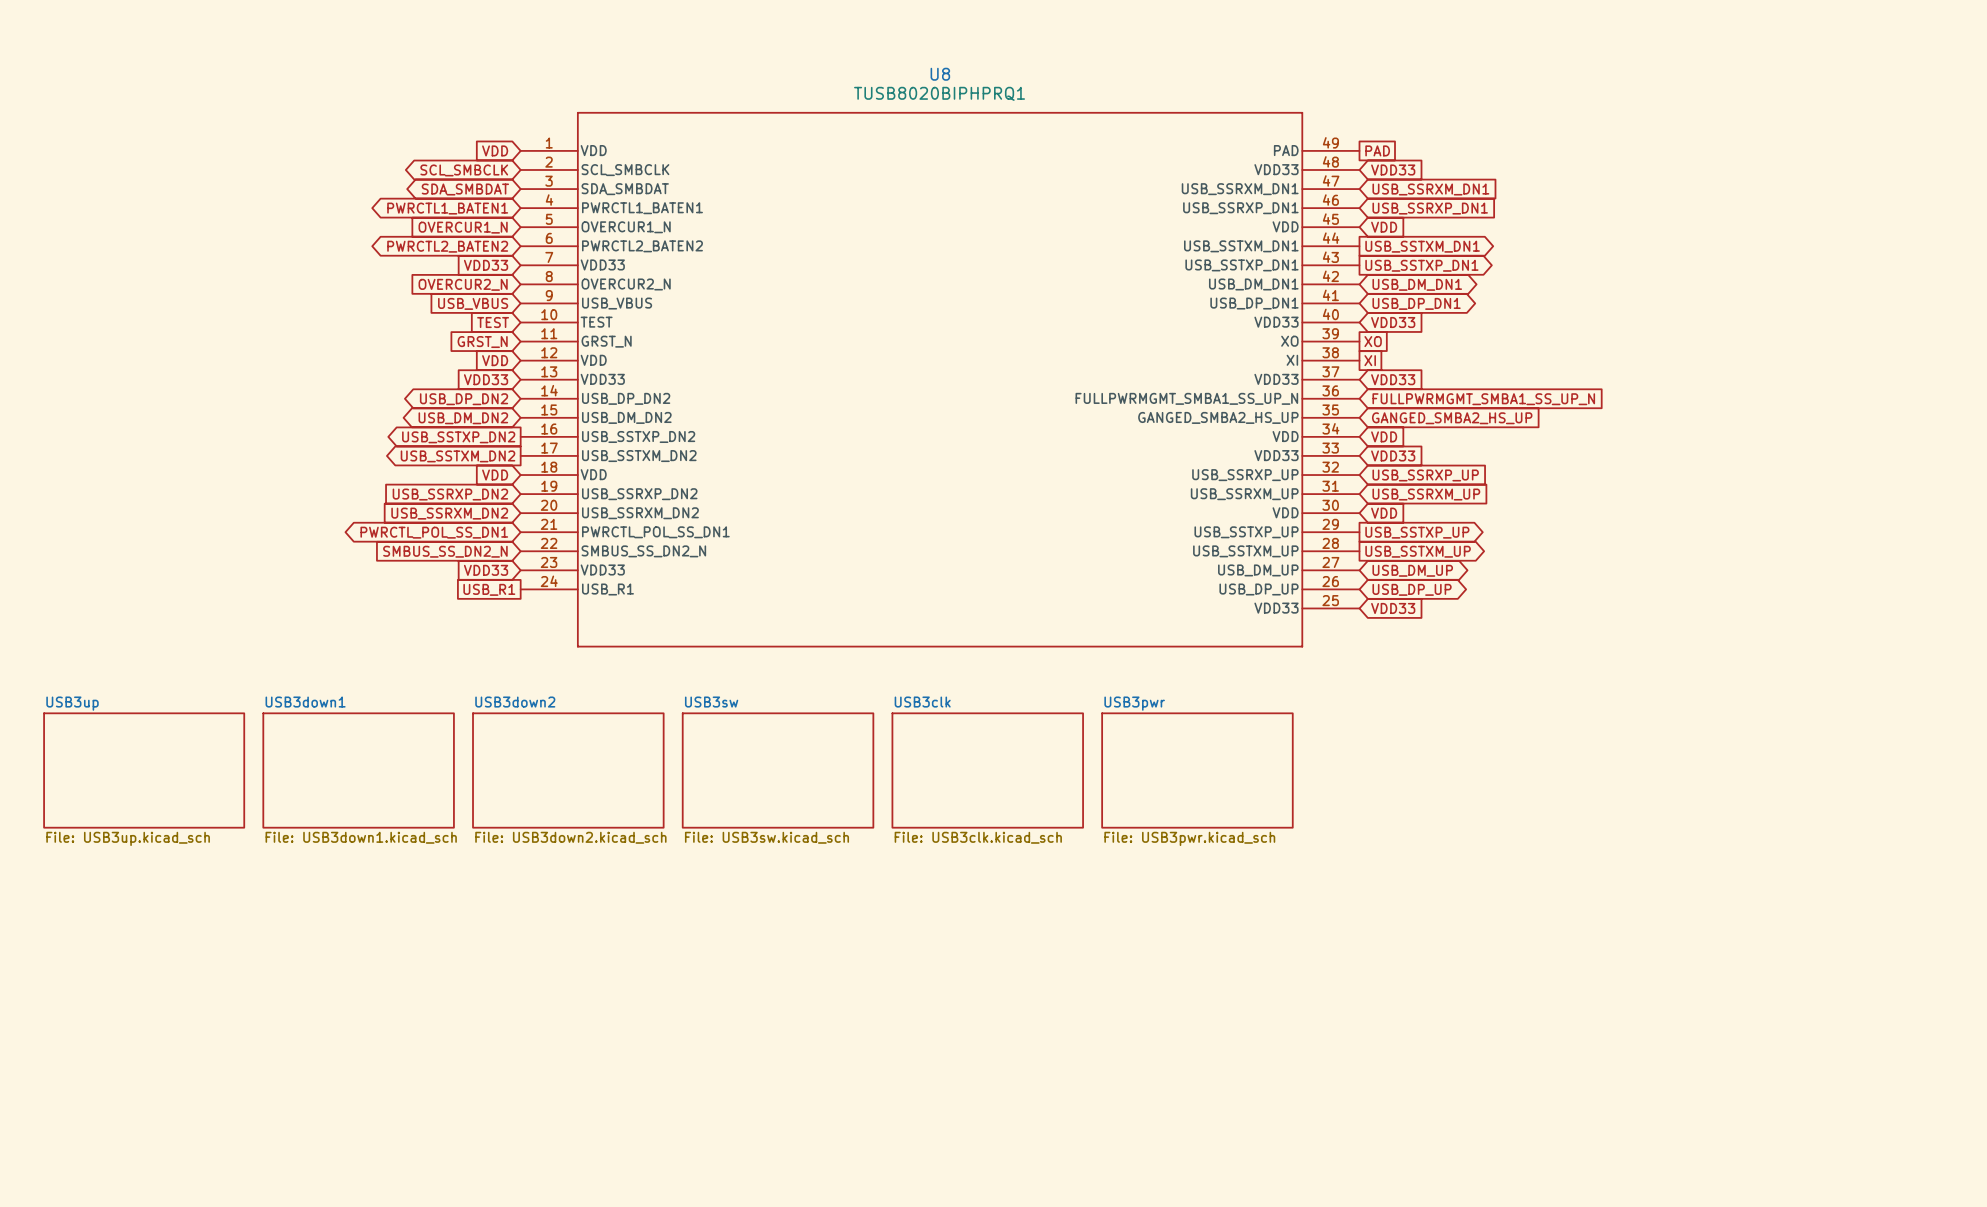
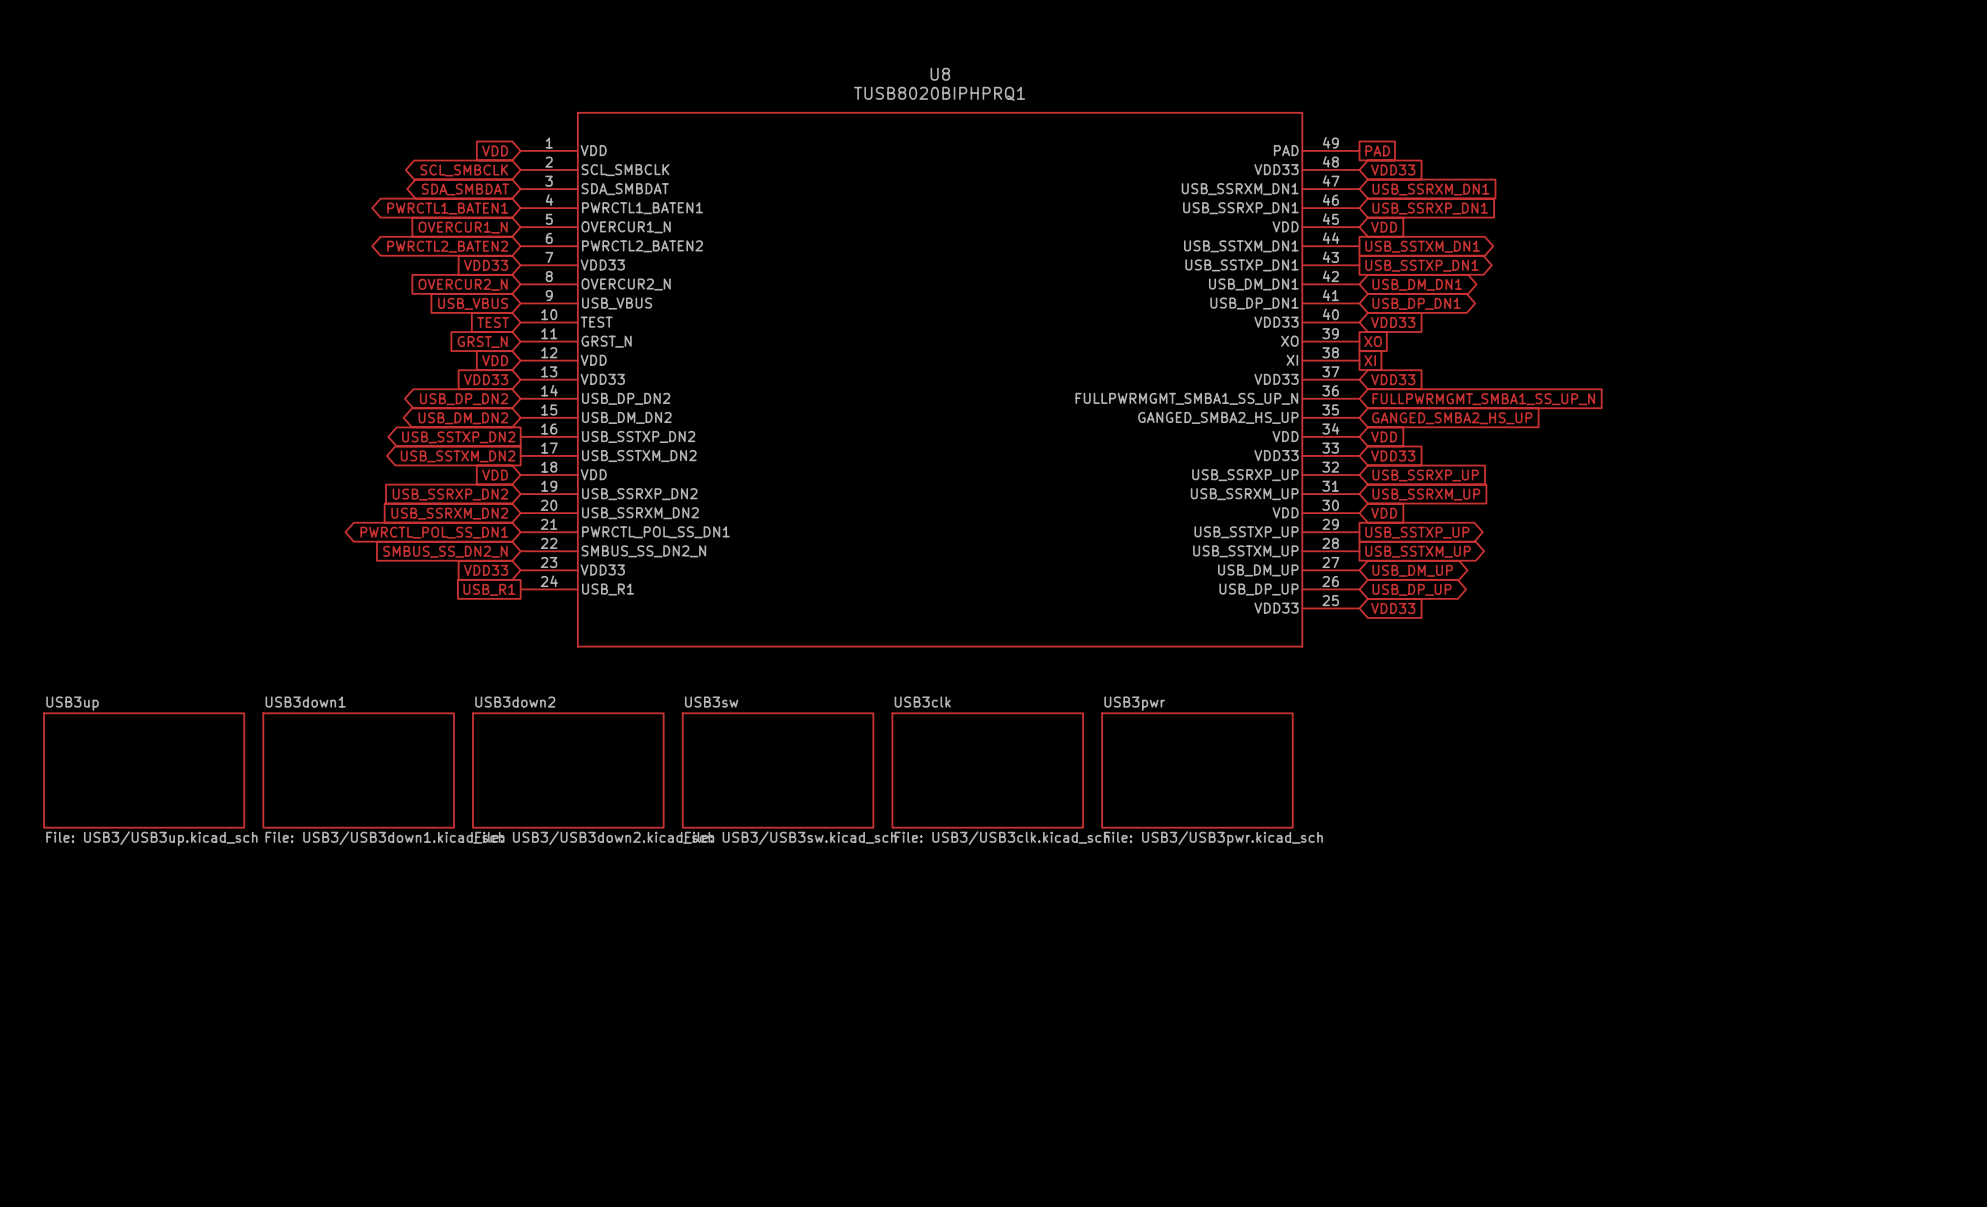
sheet USB3down1 value: File: USB3down1.kicad_sch (361, 837) -> File: USB3/USB3down1.kicad_sch (385, 838)
sheet USB3down2 value: File: USB3down2.kicad_sch (570, 837) -> File: USB3/USB3down2.kicad_sch (594, 838)
sheet USB3sw value: File: USB3sw.kicad_sch (766, 837) -> File: USB3/USB3sw.kicad_sch (790, 838)
sheet USB3clk value: File: USB3clk.kicad_sch (978, 837) -> File: USB3/USB3clk.kicad_sch (1002, 838)
sheet USB3up value: File: USB3up.kicad_sch (128, 838) -> File: USB3/USB3up.kicad_sch (151, 838)
sheet USB3pwr value: File: USB3pwr.kicad_sch (1189, 838) -> File: USB3/USB3pwr.kicad_sch (1213, 838)

